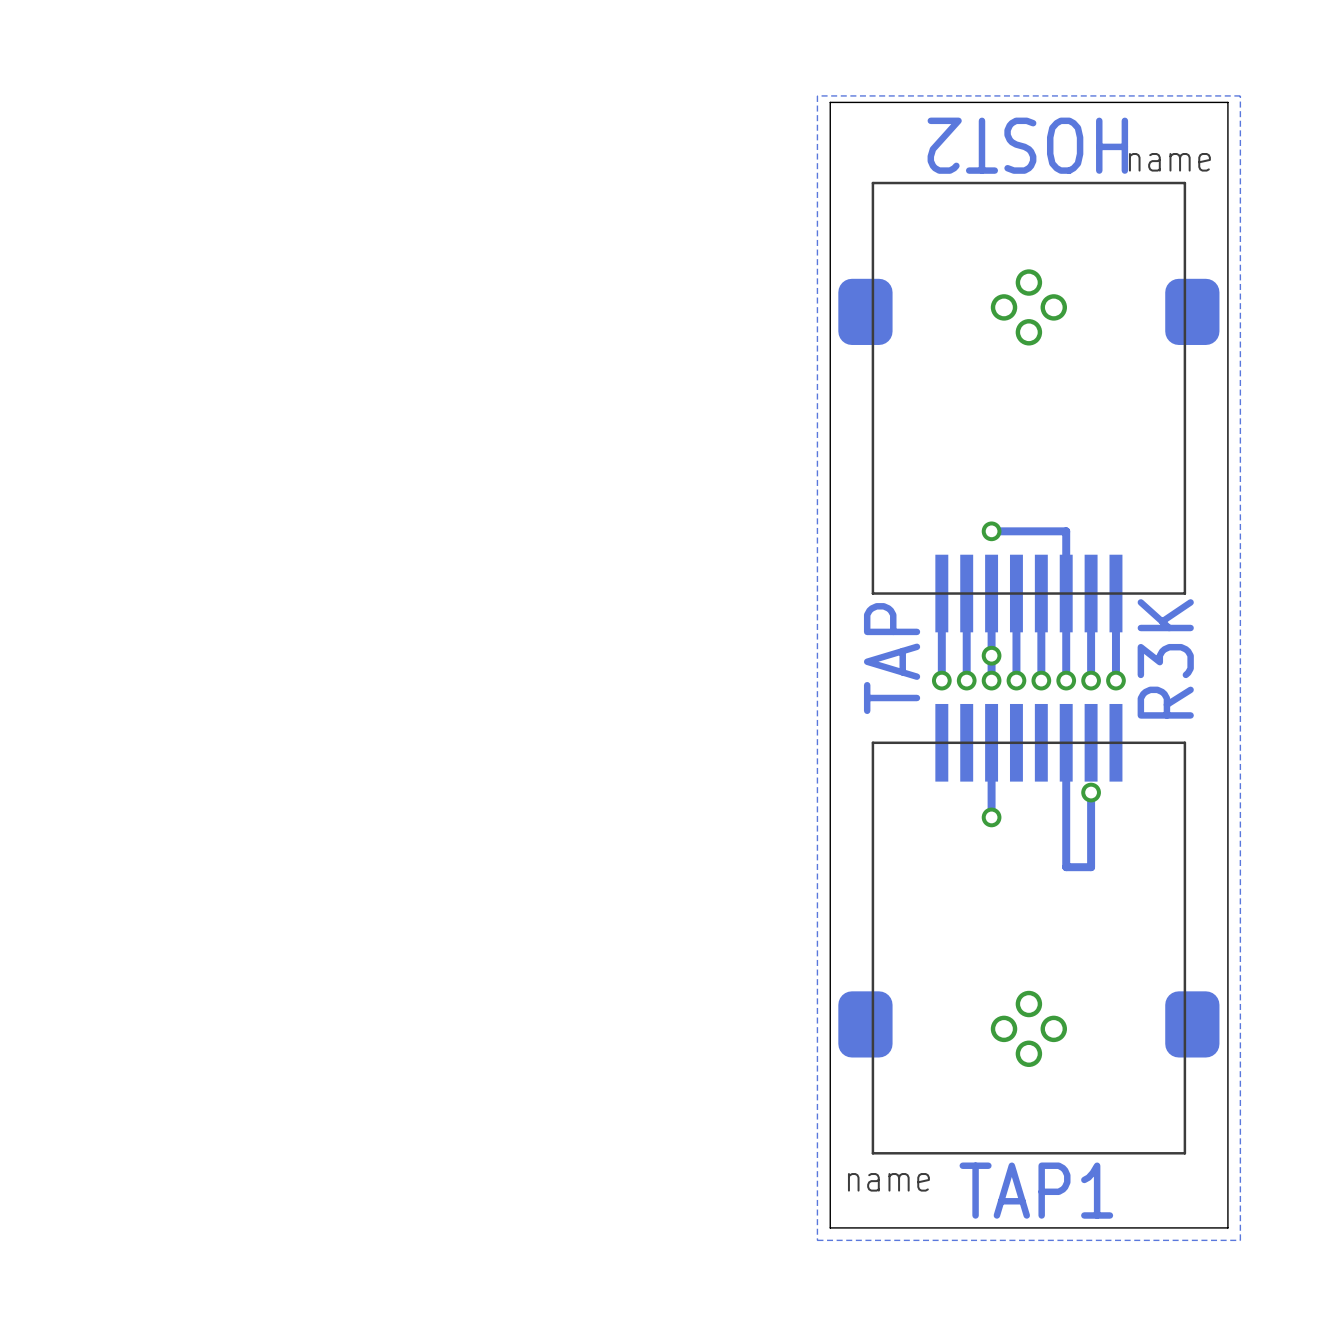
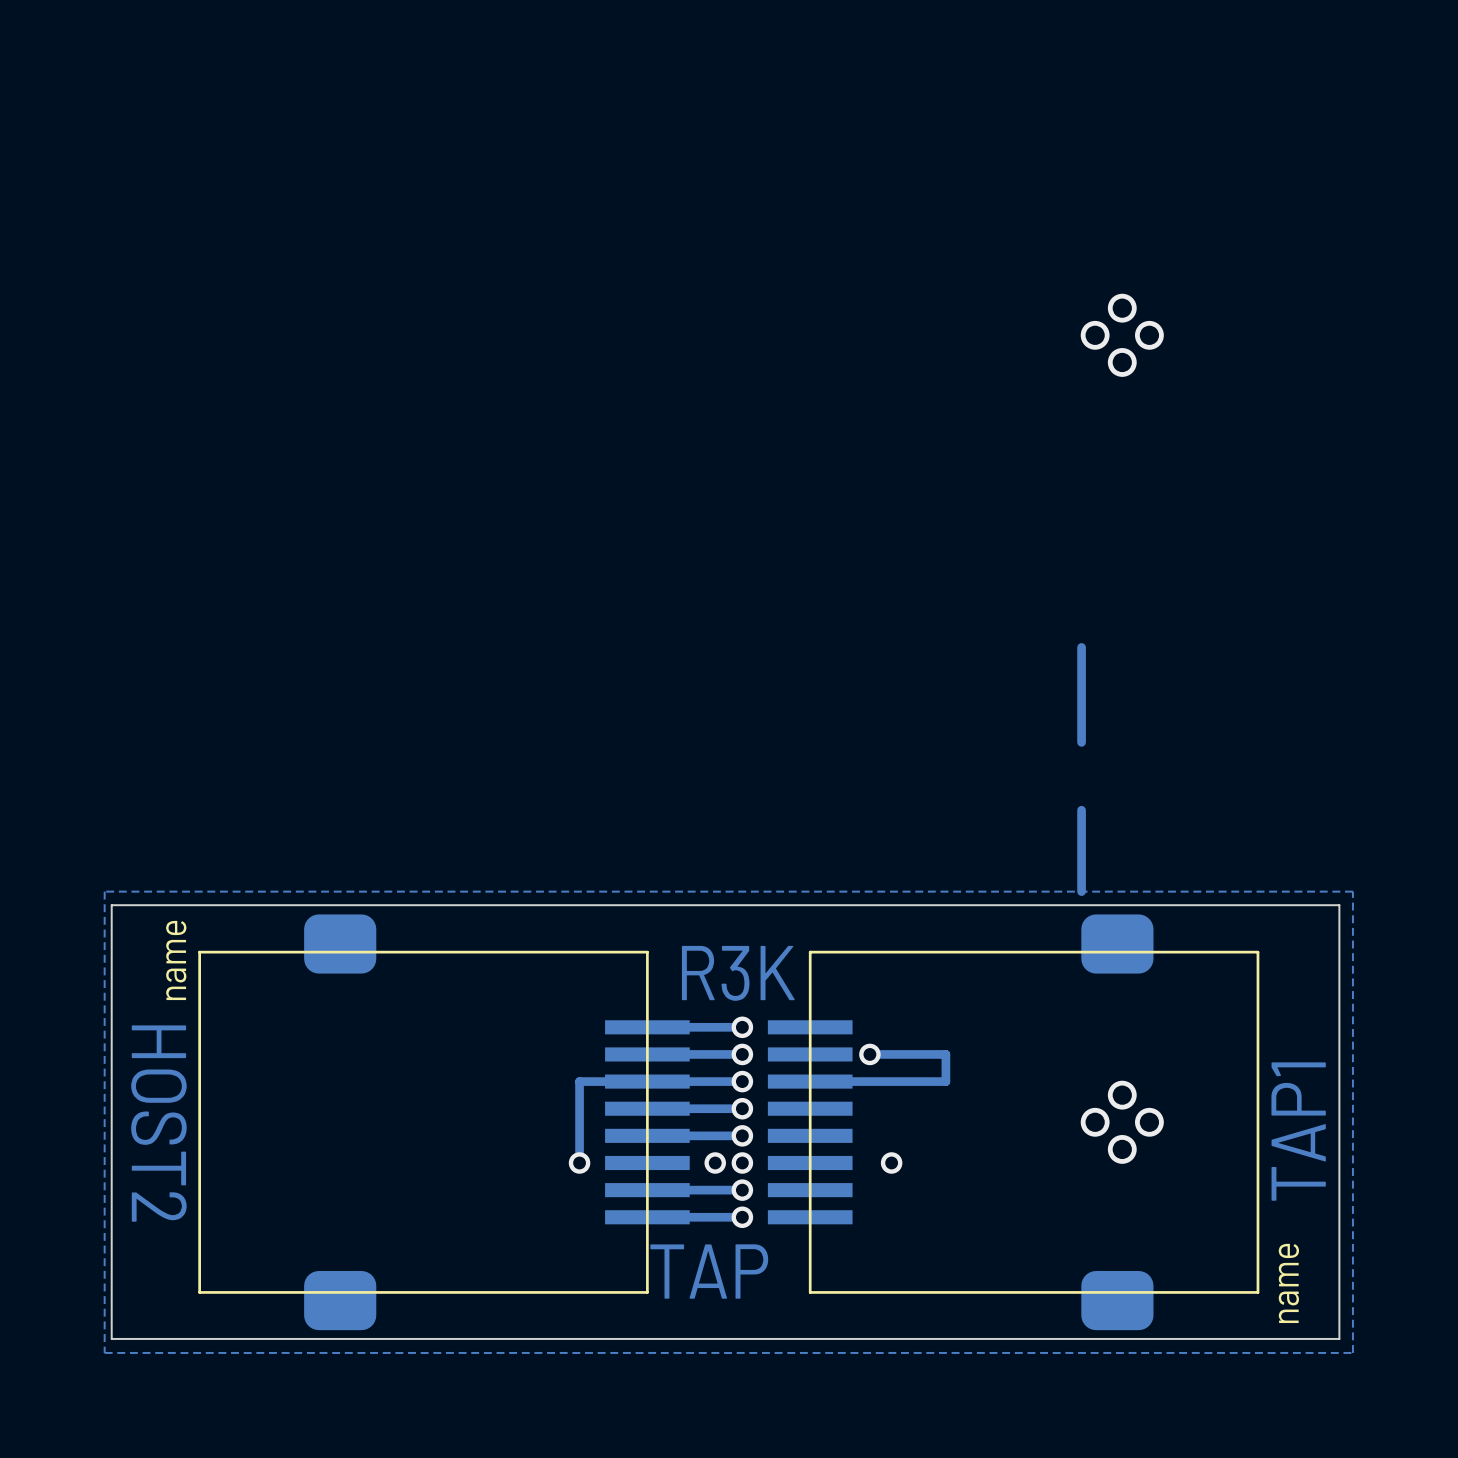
text: HOST2 (1027, 145) -> none
part: (1028, 407) -> none
track: (991, 531) (1066, 531) (1066, 680) -> none
via: (991, 531) -> none
track: (941, 593) (941, 680) -> none
track: (966, 593) (966, 680) -> none
track: (1016, 593) (1016, 680) -> none
track: (1041, 593) (1041, 680) -> none
track: (1091, 593) (1091, 680) -> none
track: (1115, 593) (1115, 680) -> none
via: (991, 655) -> none
text: TAP (892, 658) -> none
text rotation: 0° (1165, 658) -> 90° clockwise (738, 973)
text position: R3K (1165, 658) -> R3K (738, 973)
via: (941, 680) -> none
via: (966, 680) -> none
via: (991, 680) -> none
via: (1016, 680) -> none
via: (1041, 680) -> none
via: (1066, 680) -> none
via: (1091, 680) -> none
via: (1115, 680) -> none
track: (1066, 742) (1066, 867) (1091, 867) (1091, 792) -> none
via: (1091, 792) -> none
via: (991, 817) -> none
zone outline: (1240, 817) (1240, 95) (817, 95) (817, 1240) -> (1352, 891) (104, 891) (104, 1352) (891, 1352)
board edge: (1227, 829) (1227, 102) (830, 102) (830, 1227) (1227, 1227) -> (1339, 905) (111, 905) (111, 1338) (1339, 1338)
part rotation: 0° (1028, 929) -> 90° counterclockwise (1013, 1122)
track: none -> (742, 1027) (647, 1027)
via: none -> (742, 1027)
track: none -> (742, 1054) (647, 1054)
via: none -> (742, 1054)
track: none -> (869, 1054) (945, 1054) (945, 1081) (810, 1081)
via: none -> (869, 1054)
track: none -> (742, 1081) (579, 1081) (579, 1162)
via: none -> (742, 1081)
track: none -> (742, 1108) (647, 1108)
via: none -> (742, 1108)
part: none -> (444, 1122)
text: none -> HOST2 (158, 1123)
track: none -> (742, 1135) (647, 1135)
via: none -> (742, 1135)
via: none -> (579, 1162)
via: none -> (715, 1162)
via: none -> (742, 1162)
via: none -> (891, 1162)
track: none -> (742, 1190) (647, 1190)
via: none -> (742, 1190)
track: none -> (742, 1217) (647, 1217)
via: none -> (742, 1217)
text: none -> TAP (709, 1271)
text rotation: 0° (1036, 1190) -> 90° counterclockwise (1298, 1131)
text position: TAP1 (1036, 1190) -> TAP1 (1298, 1131)

